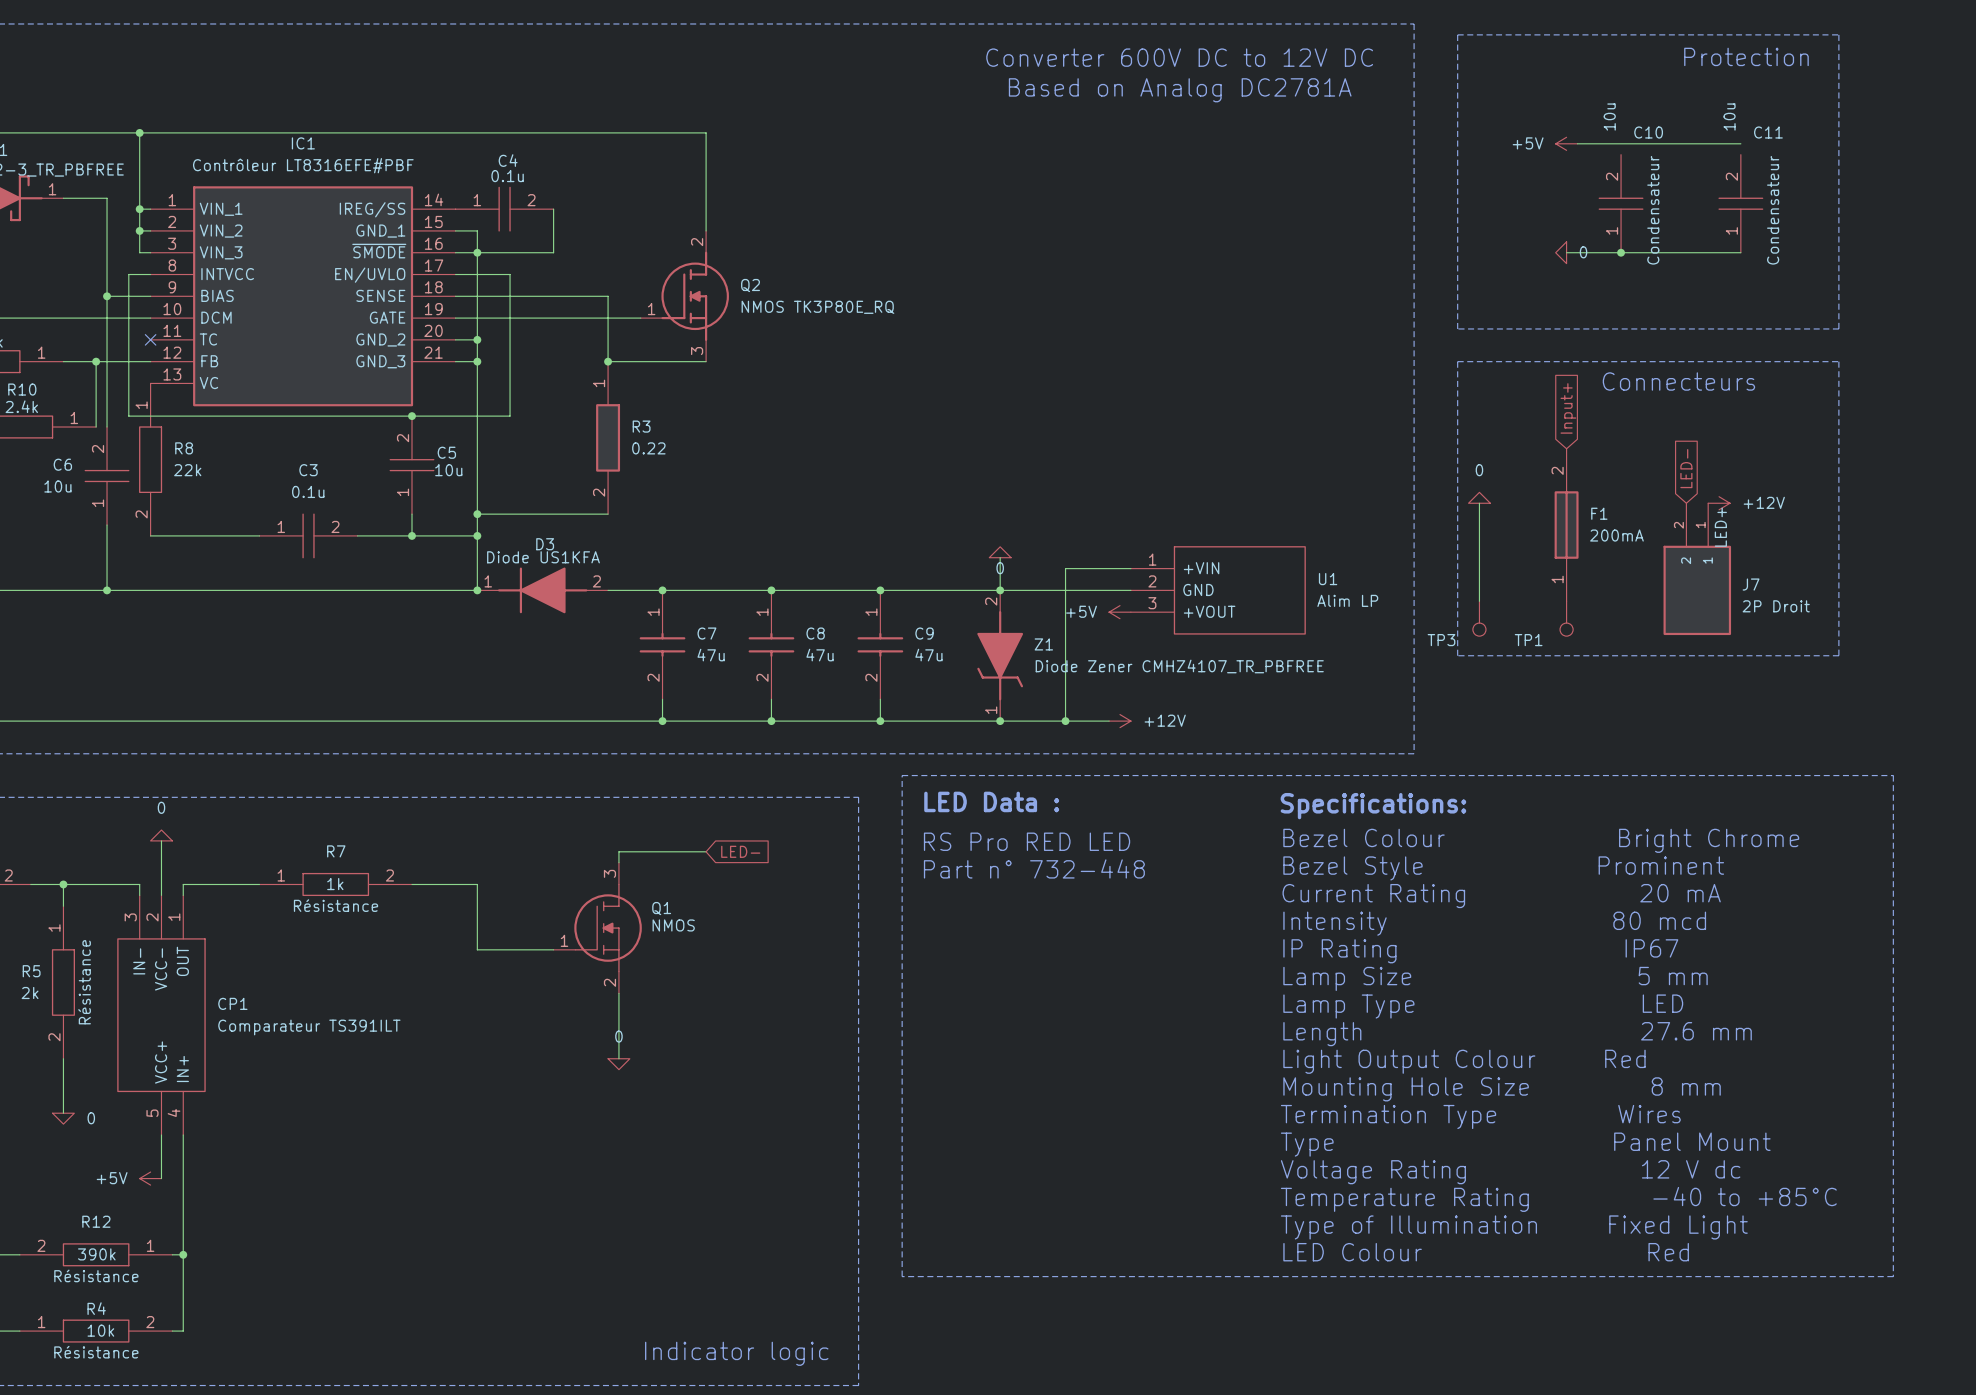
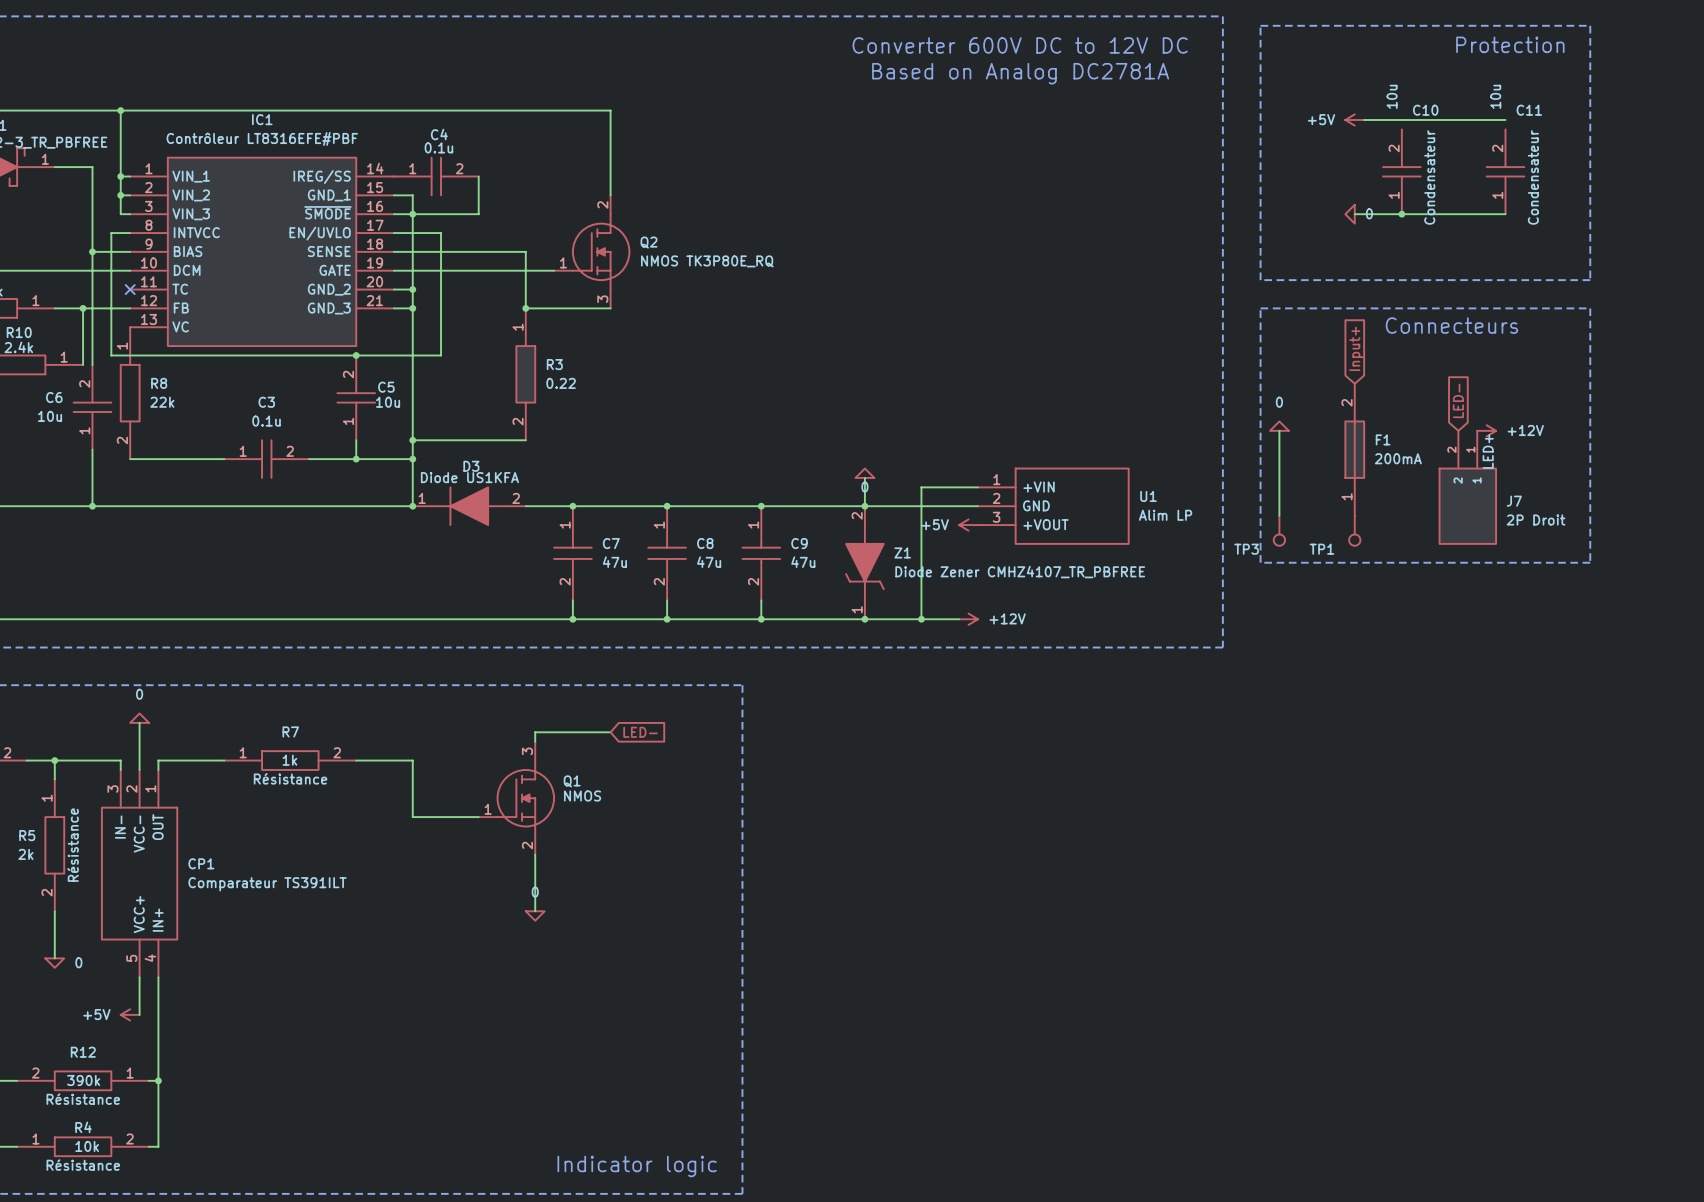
line: (902, 775) (1893, 775) (1893, 1276) (902, 1276) (902, 775) -> none
text: LED Data : (991, 801) -> none
text: Specifications: (1373, 806) -> none
text: Bezel Colour Bright Chrome (1541, 840) -> none
text: RS Pro RED LED (1027, 841) -> none
text: Part n° 732-448 (1034, 868) -> none
text: Bezel Style Prominent (1503, 868) -> none
text: Current Rating 20 mA (1501, 896) -> none
text: Intensity 80 mcd (1494, 923) -> none
text: IP Rating IP67 (1480, 951) -> none
text: Lamp Size 5 mm (1495, 978) -> none
text: Lamp Type LED (1483, 1006) -> none
text: Length 27.6 mm (1517, 1034) -> none
text: Light Output Colour Red (1464, 1061) -> none
text: Mounting Hole Size 8 mm (1502, 1089) -> none
text: Termination Type Wires (1480, 1116) -> none
text: Type Panel Mount (1525, 1144) -> none
text: Voltage Rating 12 V dc (1510, 1172) -> none
text: Temperature Rating -40 to +85°C (1558, 1199) -> none
text: Type of Illumination Fixed Light (1514, 1227) -> none
text: LED Colour Red (1486, 1252) -> none

